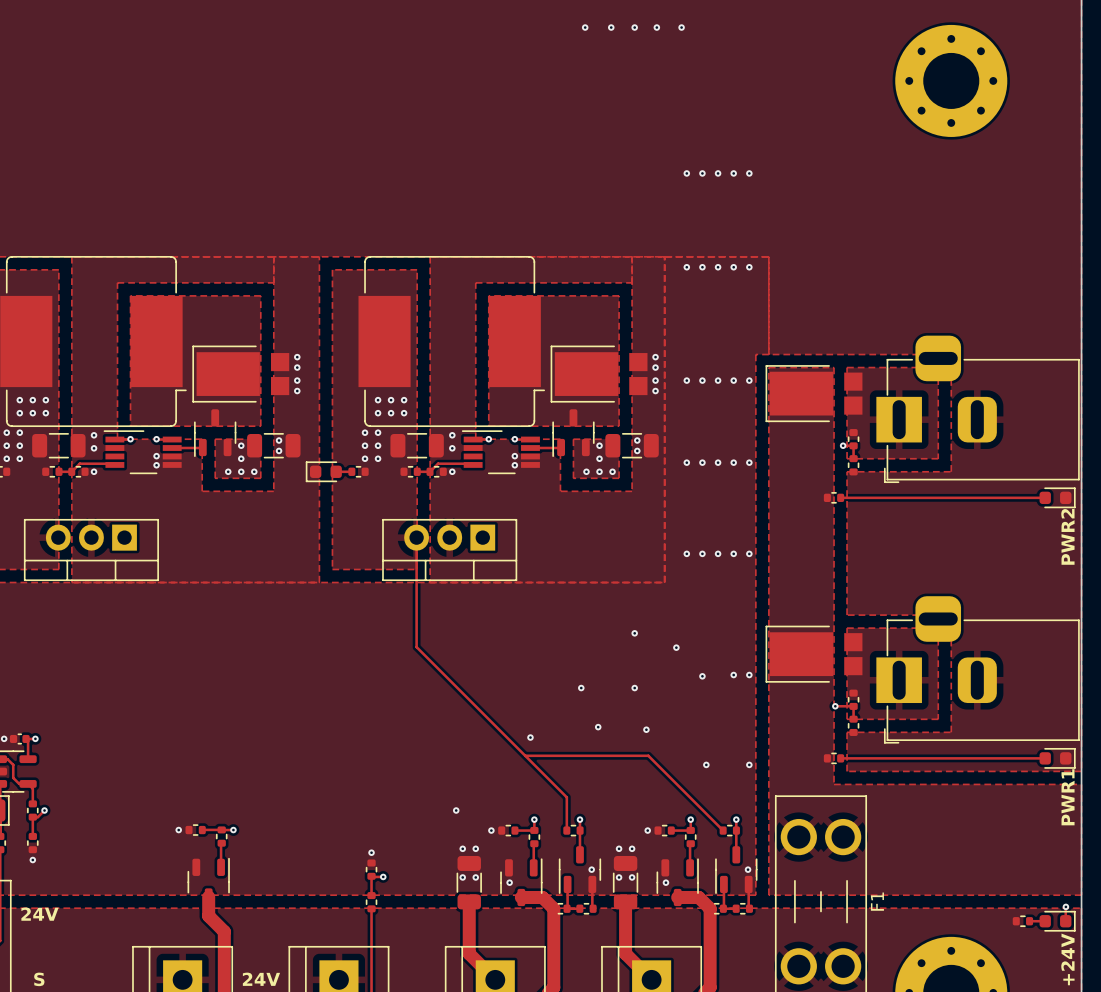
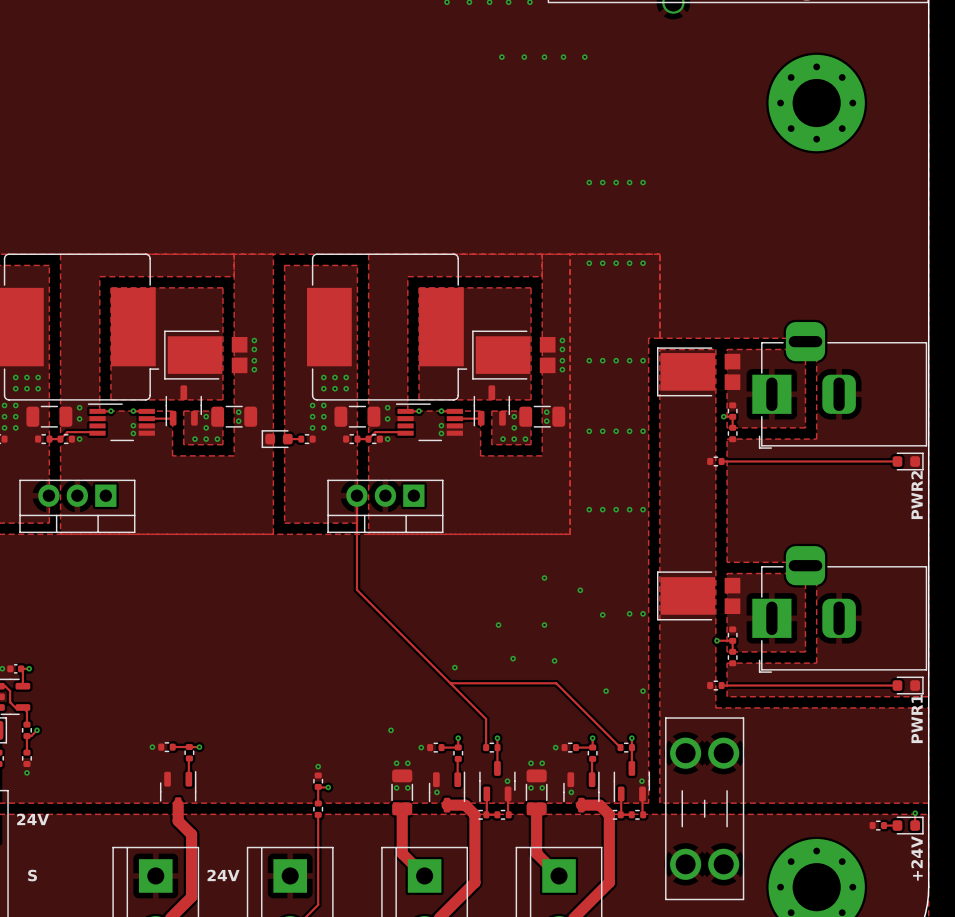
F1 name: F1 (877, 901) -> none

